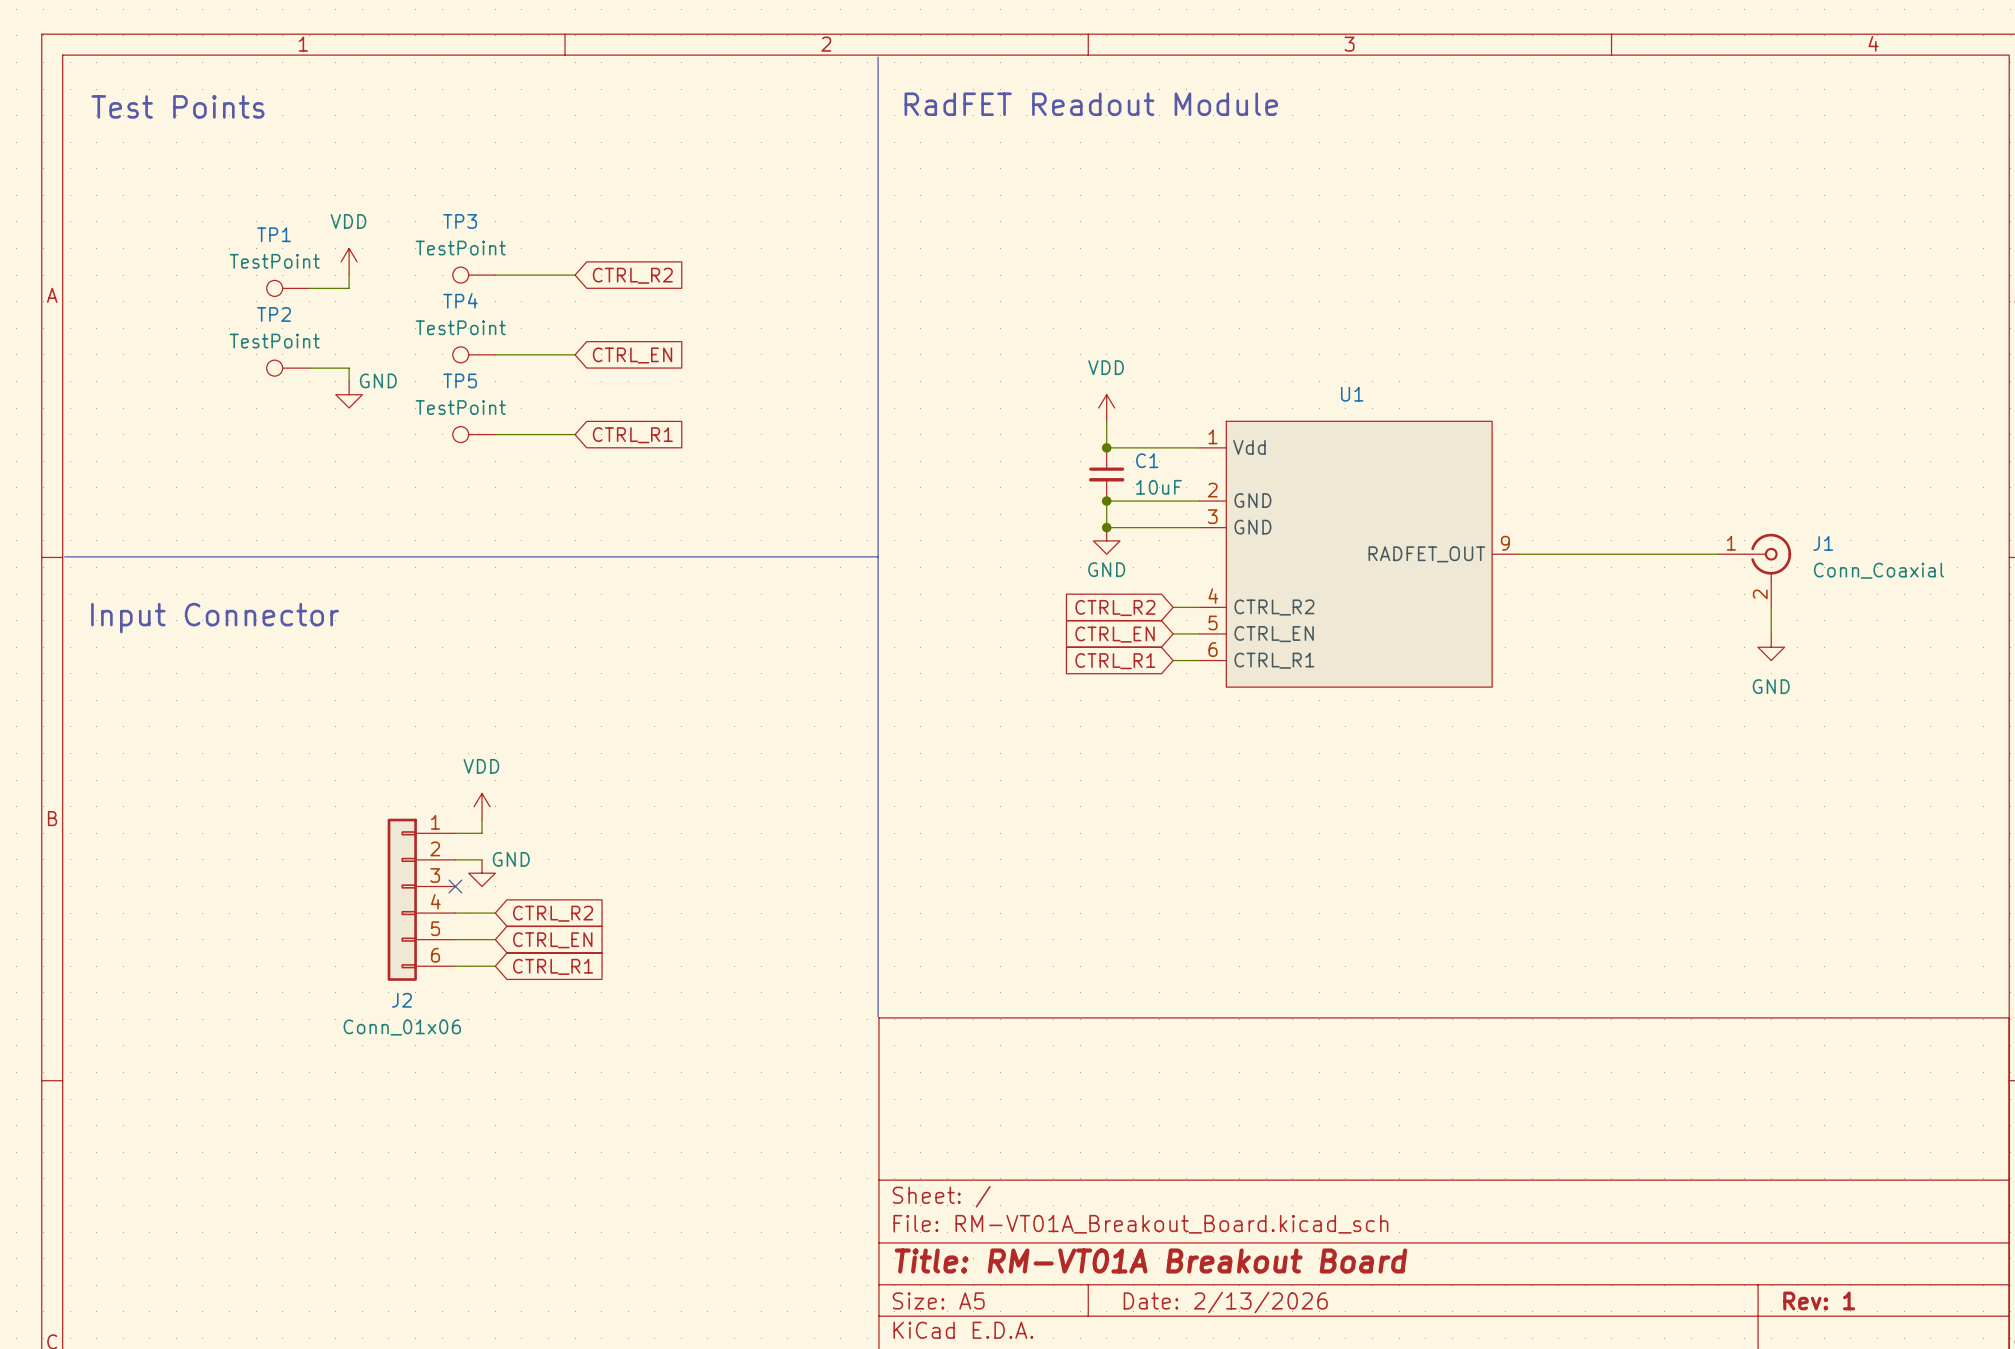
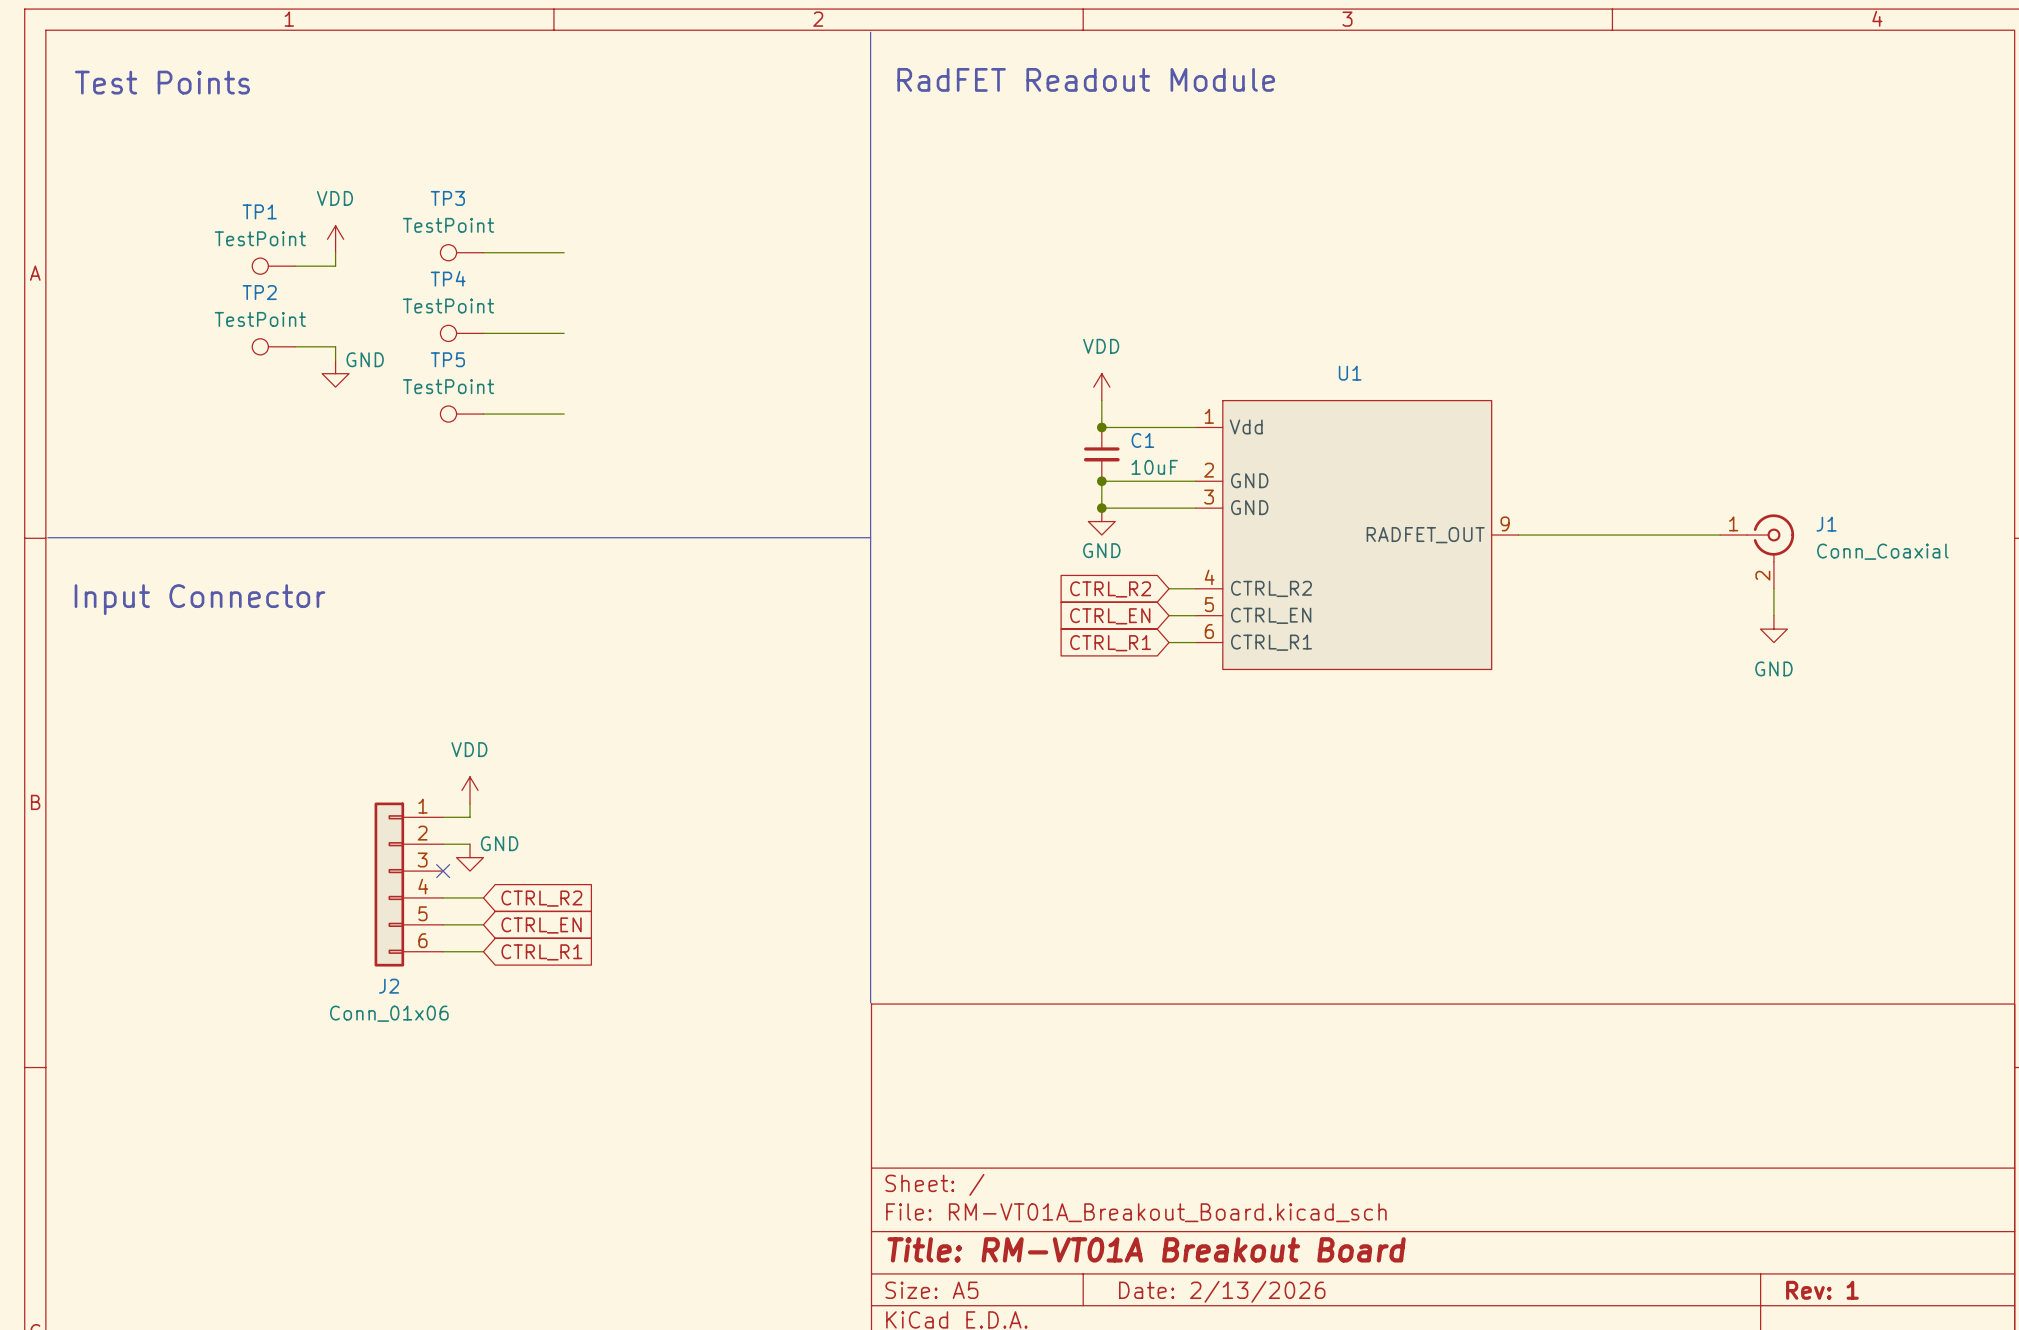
global label: CTRL_R2 (632, 275) -> none
global label: CTRL_EN (632, 355) -> none
global label: CTRL_R1 (632, 435) -> none

